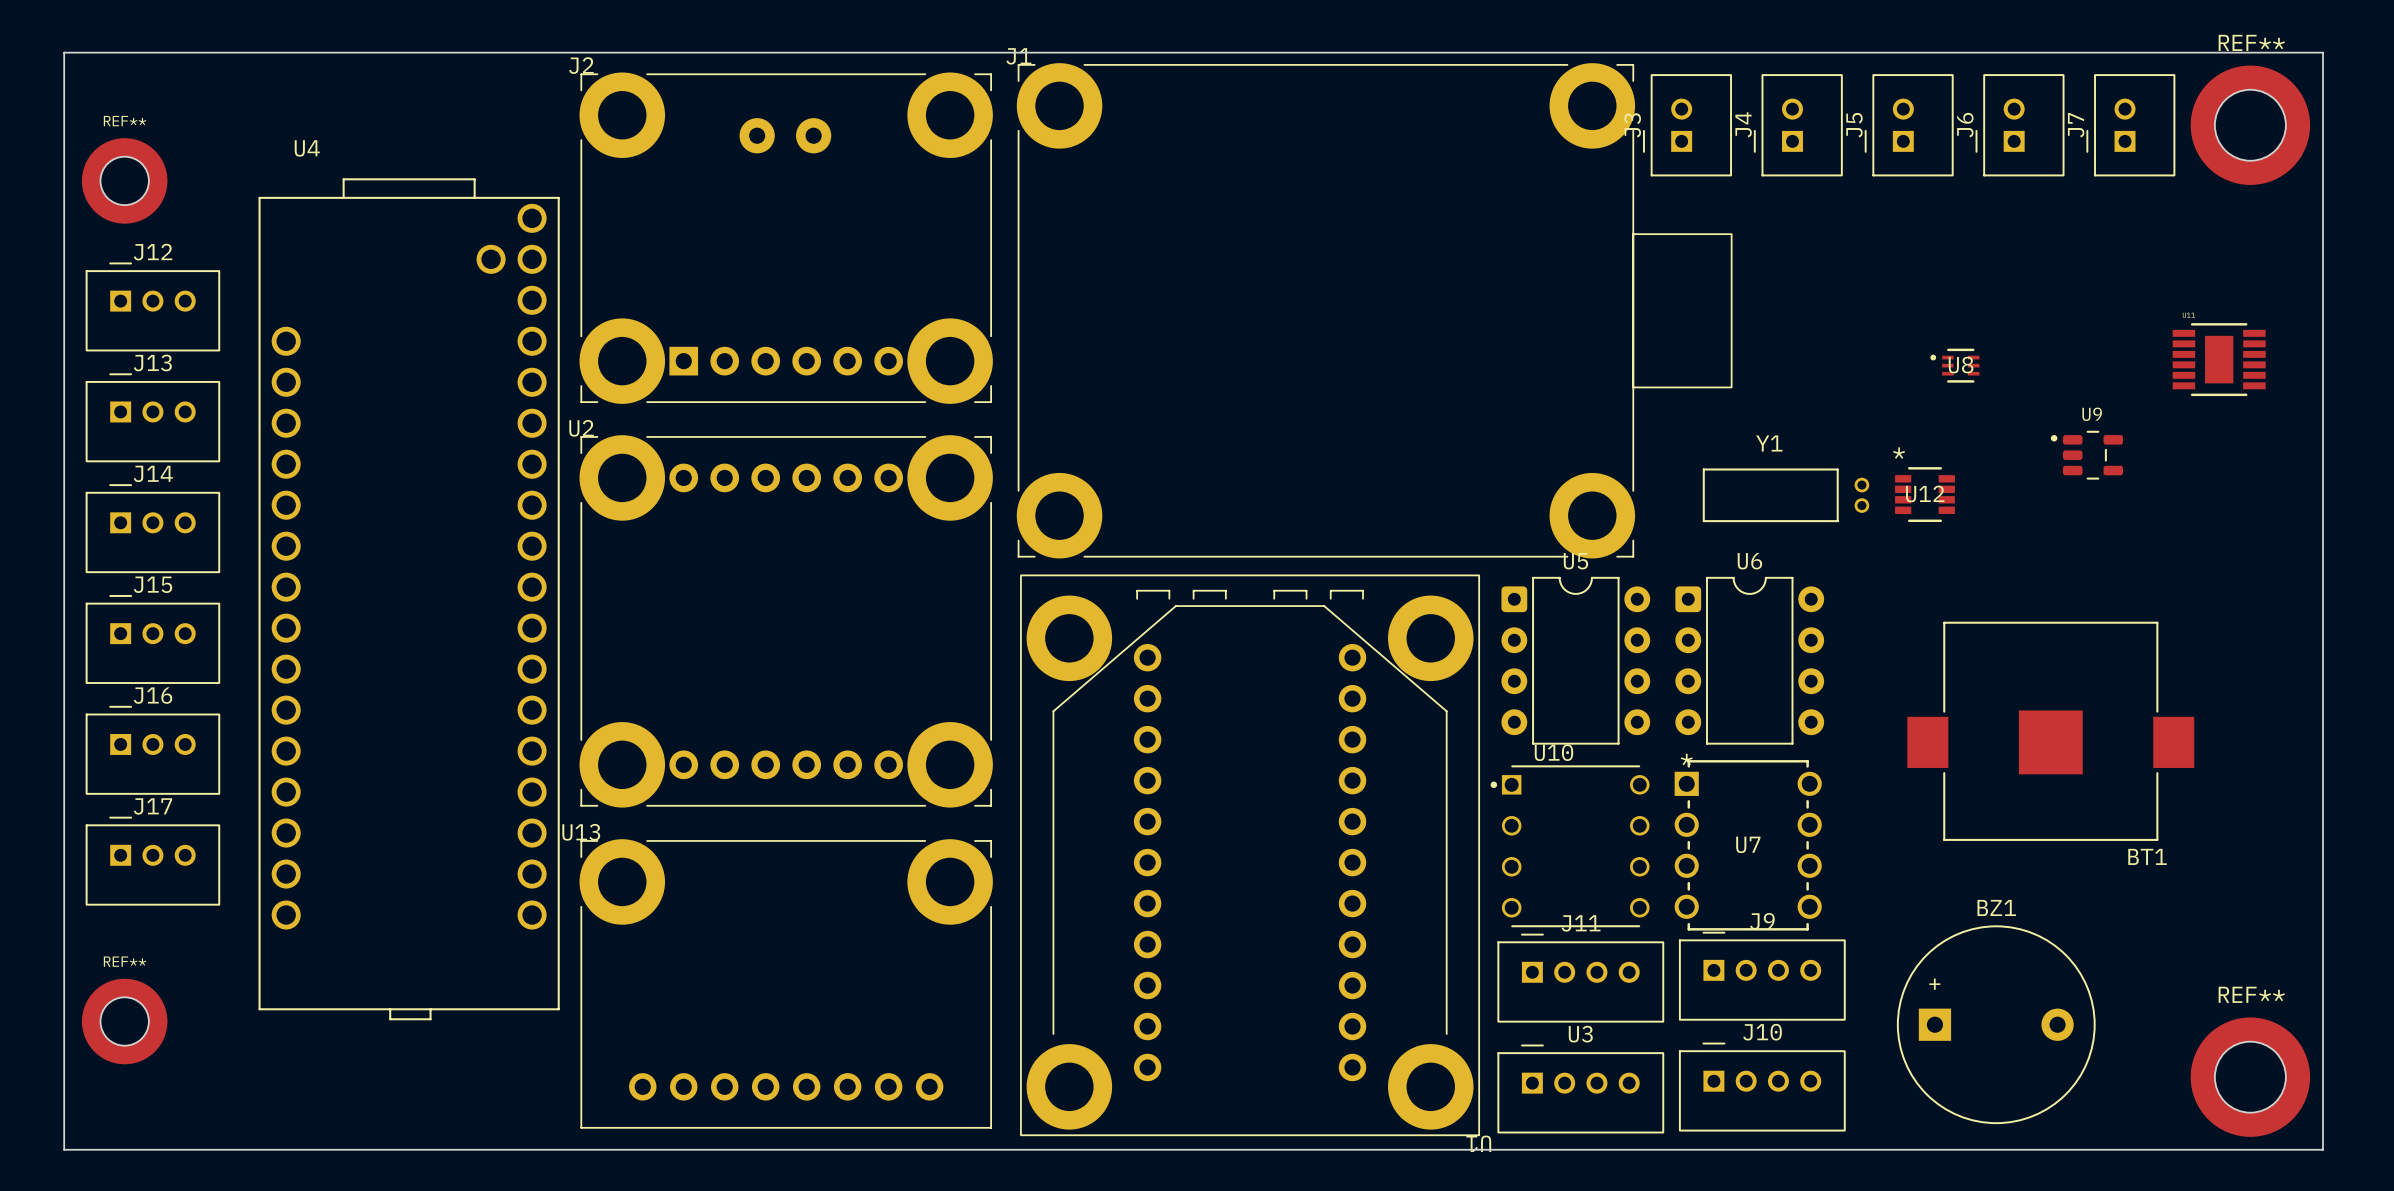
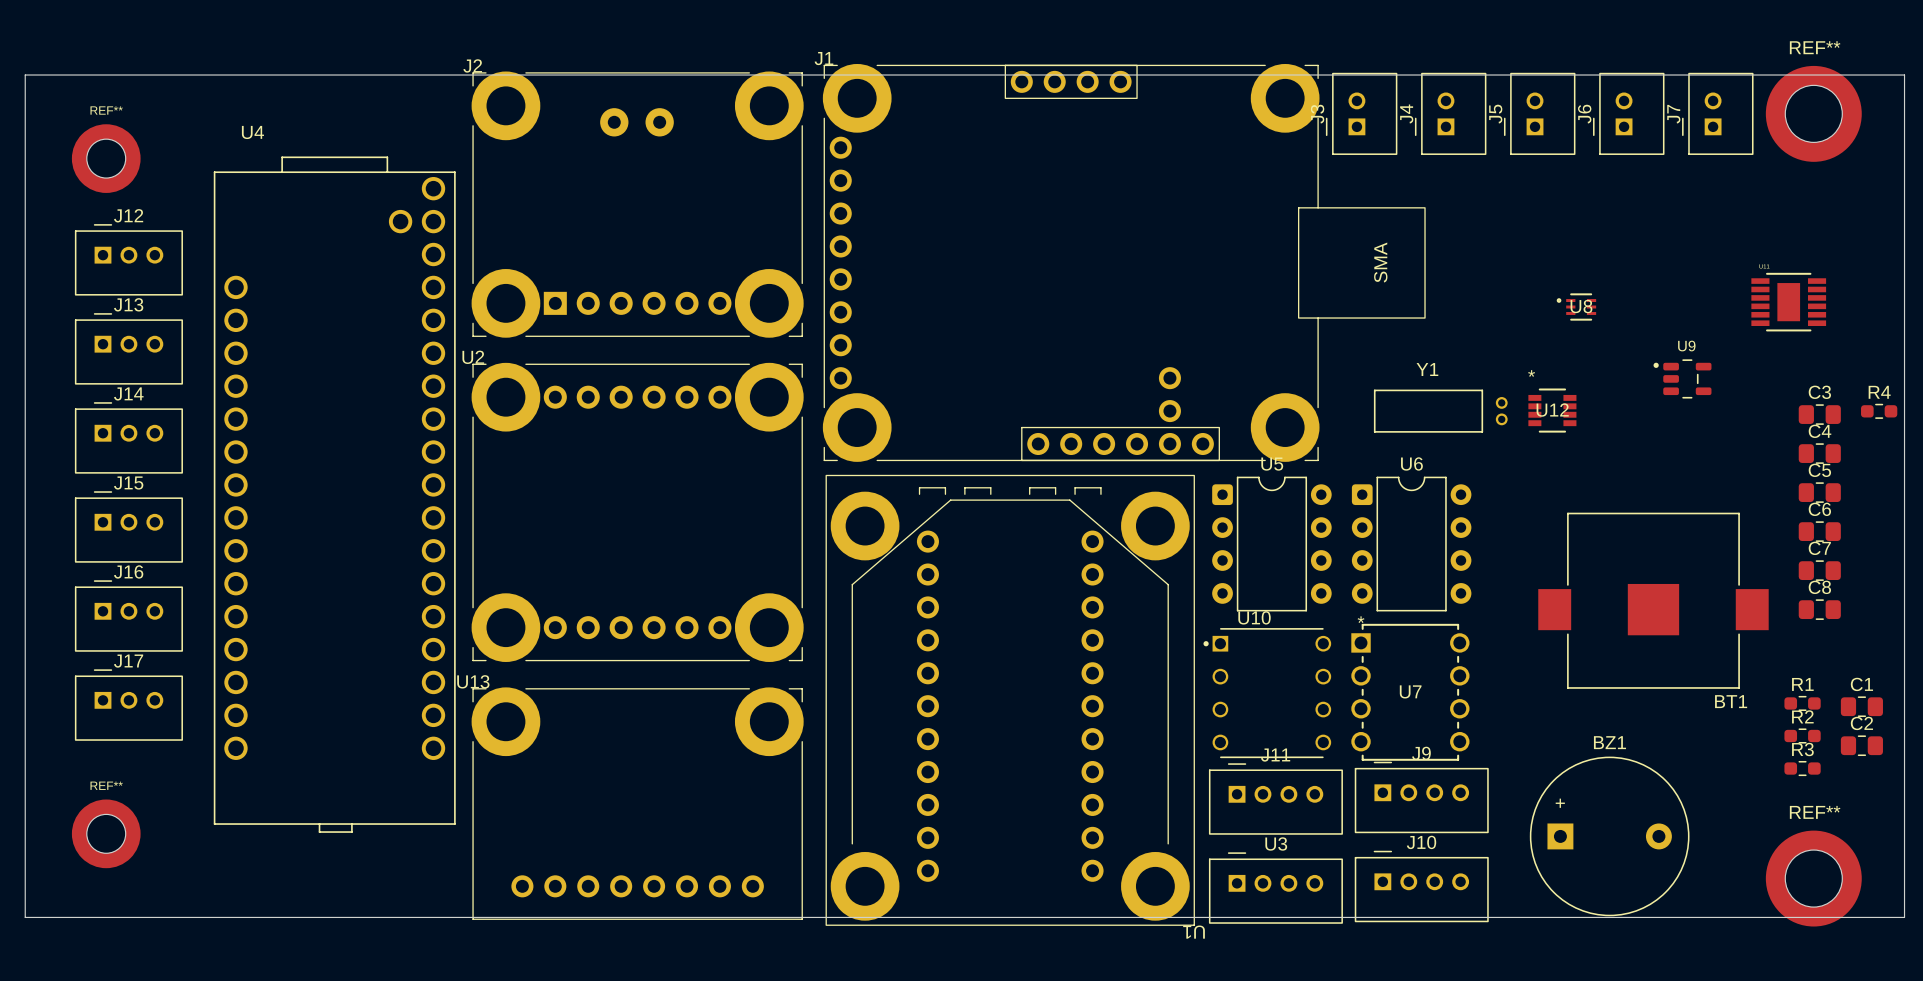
board edge: (64, 52) (2322, 52) (2322, 1149) (64, 1149) (64, 52) -> (25, 75) (25, 917) (1904, 917) (1904, 75) (25, 75)
J1 footprint: [1016, 63, 1733, 559] -> [822, 63, 1426, 462]
R4: none -> (1879, 411)
C3: none -> (1819, 414)
C4: none -> (1819, 453)
C5: none -> (1819, 492)
C6: none -> (1819, 531)
C7: none -> (1819, 570)
C8: none -> (1819, 609)
R1: none -> (1802, 703)
C1: none -> (1861, 706)
R2: none -> (1802, 735)
C2: none -> (1861, 745)
R3: none -> (1802, 768)

